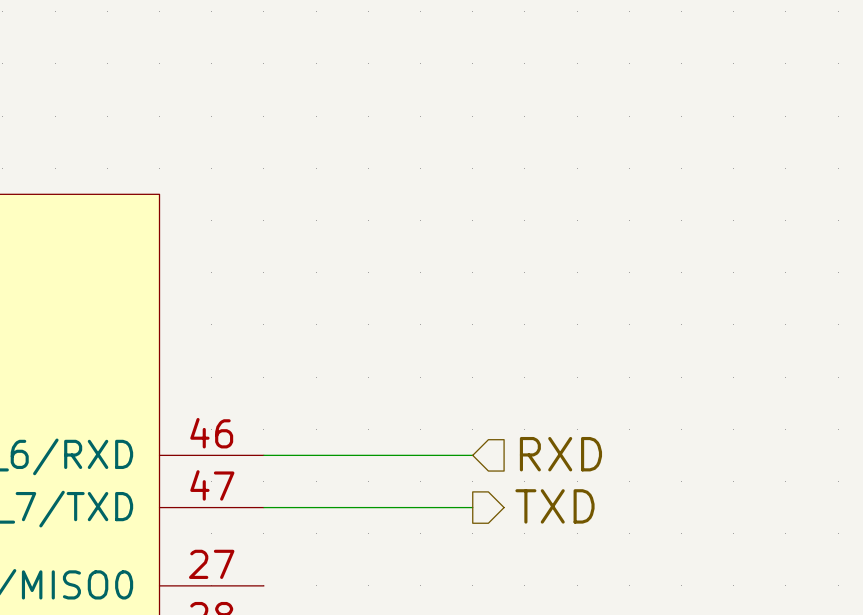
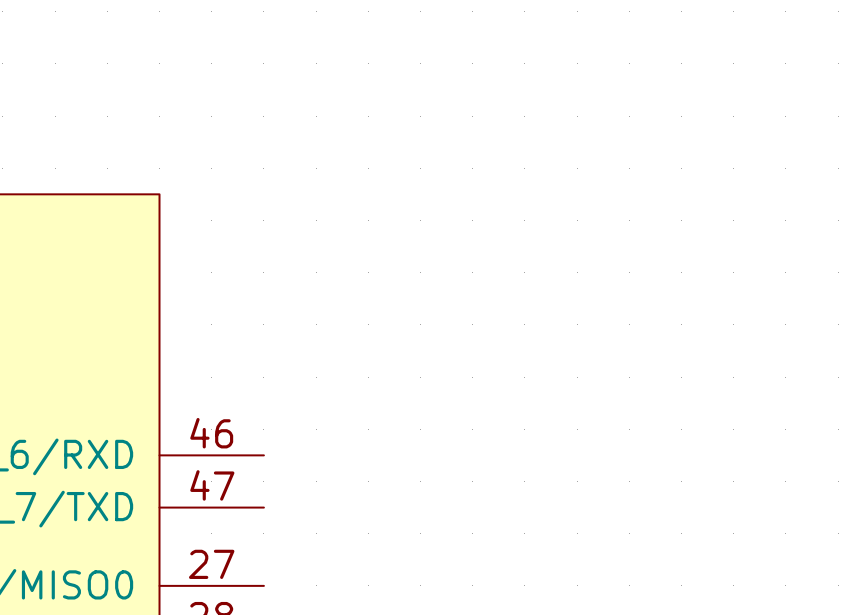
hierarchical label: RXD (560, 454) -> none
wire: (263, 455) (472, 455) -> none
hierarchical label: TXD (554, 506) -> none
wire: (263, 507) (472, 507) -> none

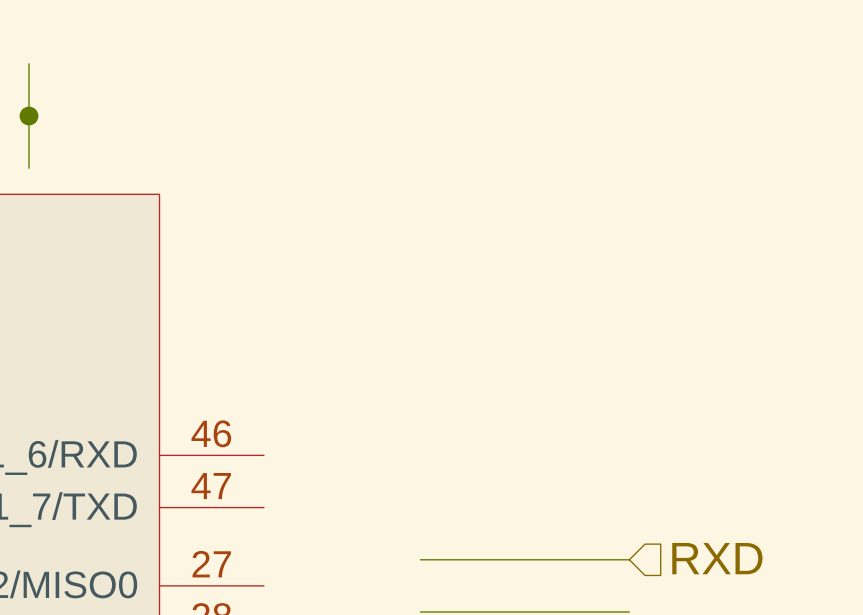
wire: none -> (28, 63) (28, 168)
junction: none -> (28, 116)
hierarchical label: none -> RXD (717, 558)
wire: none -> (420, 559) (629, 559)
wire: none -> (420, 611) (629, 611)

